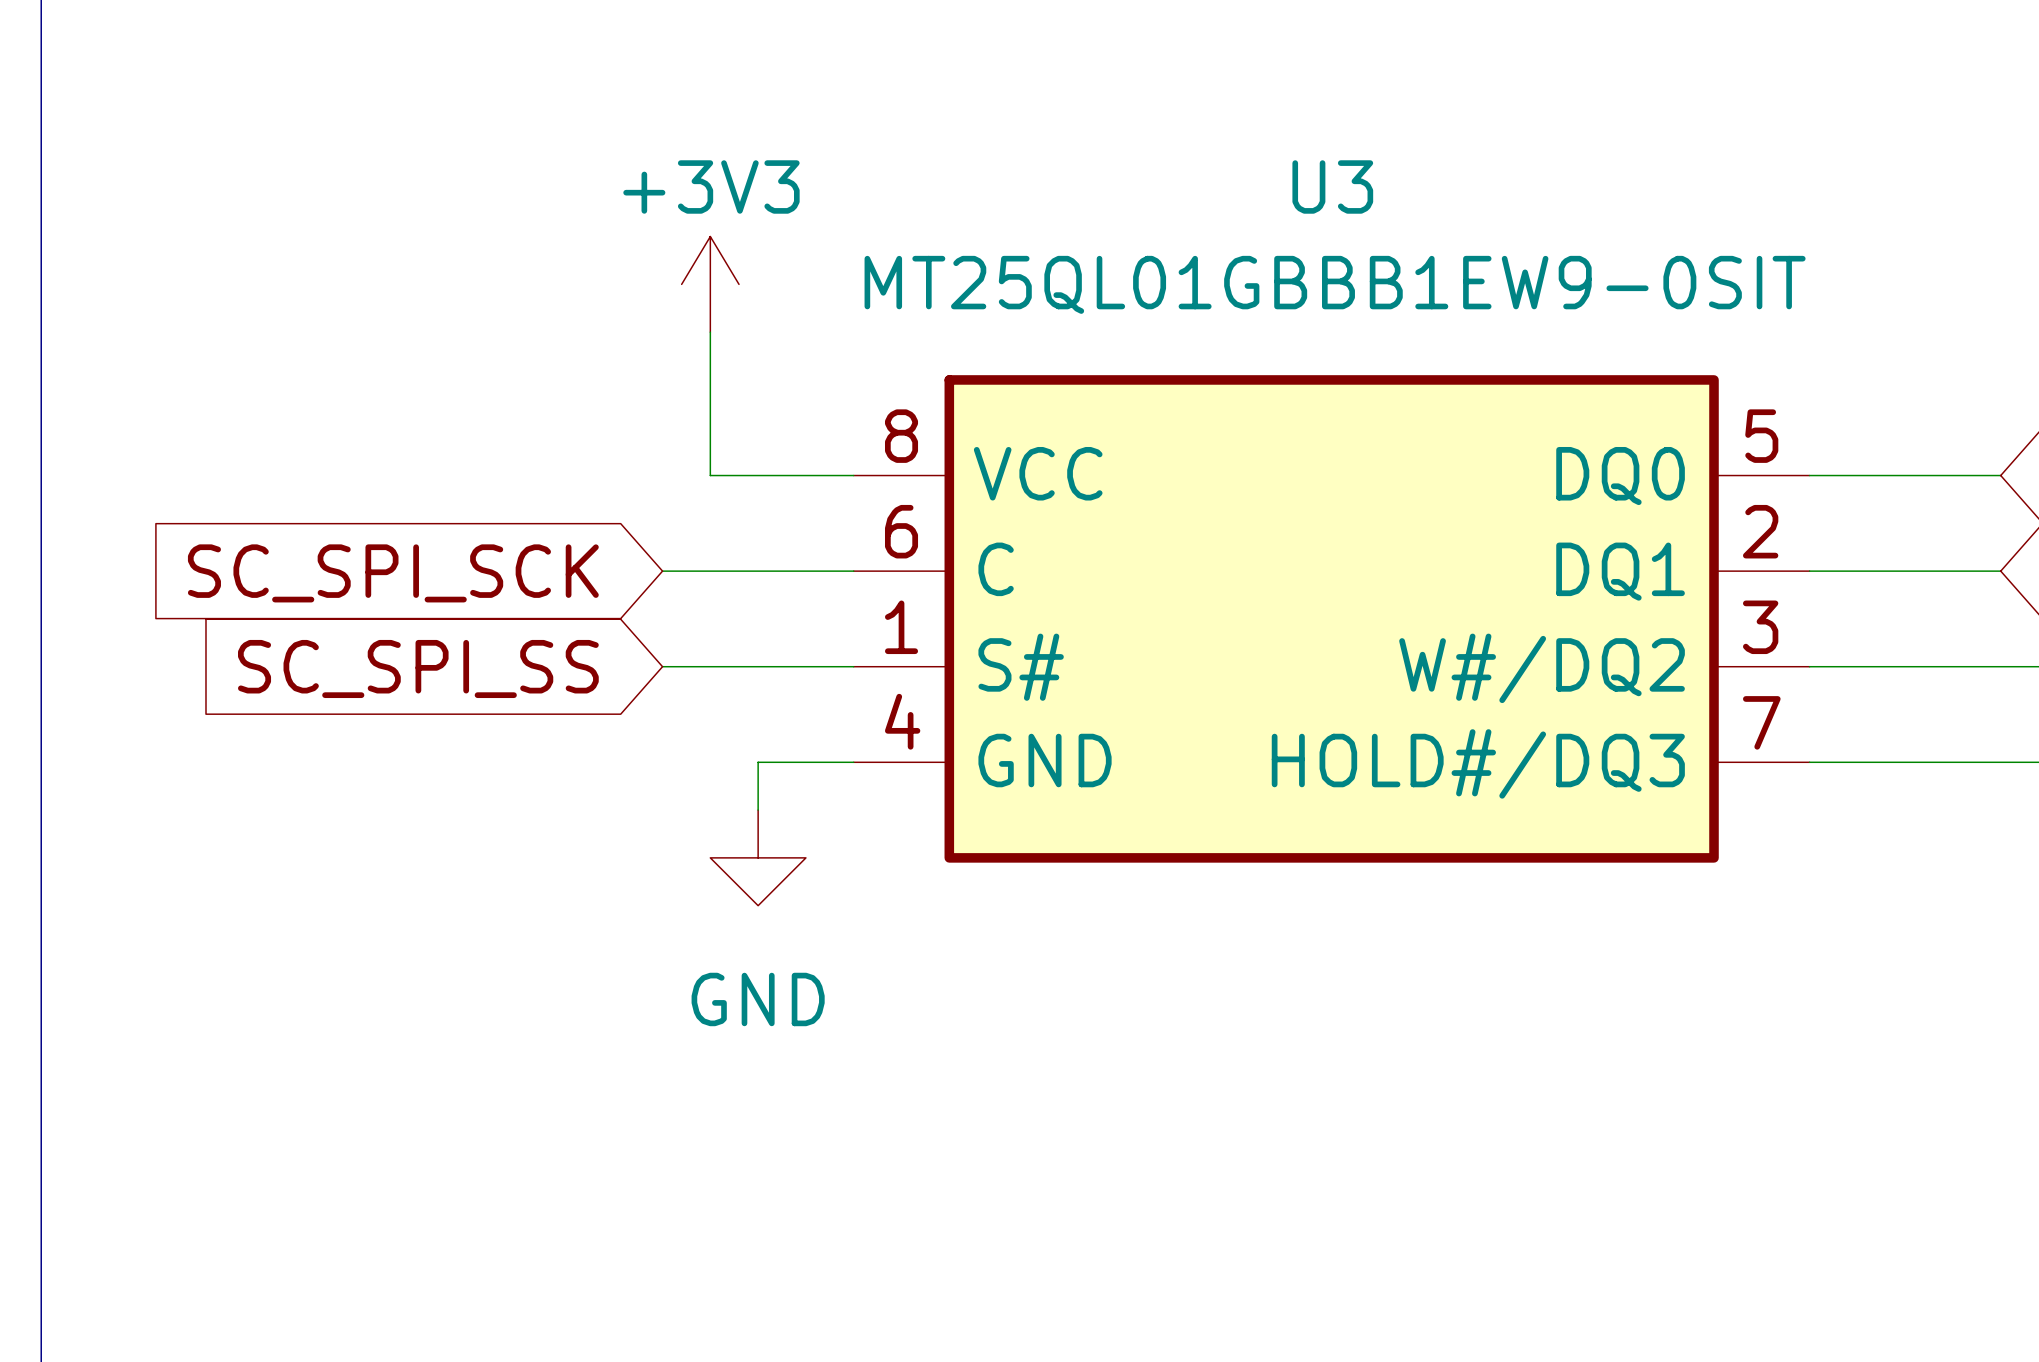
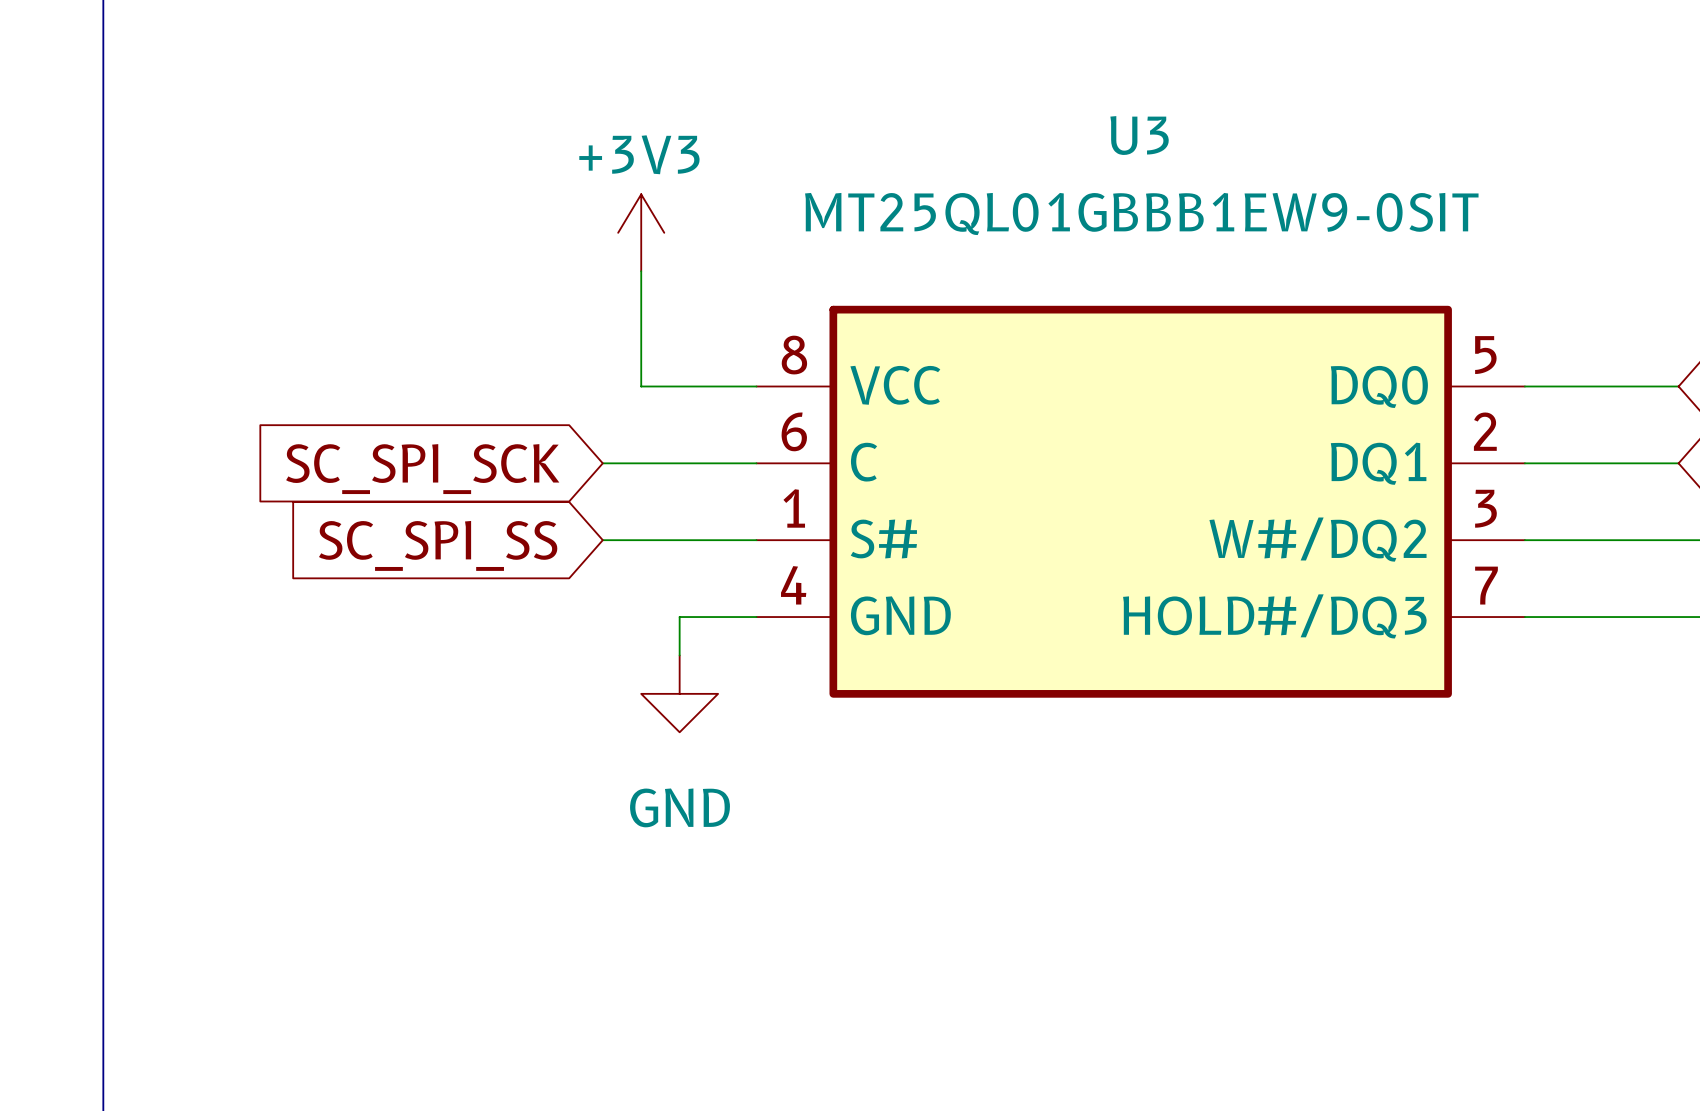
U3 name position: U3 (1332, 186) -> U3 (1139, 135)
U3 text position: MT25QL01GBBB1EW9-0SIT (1335, 284) -> MT25QL01GBBB1EW9-0SIT (1141, 213)

